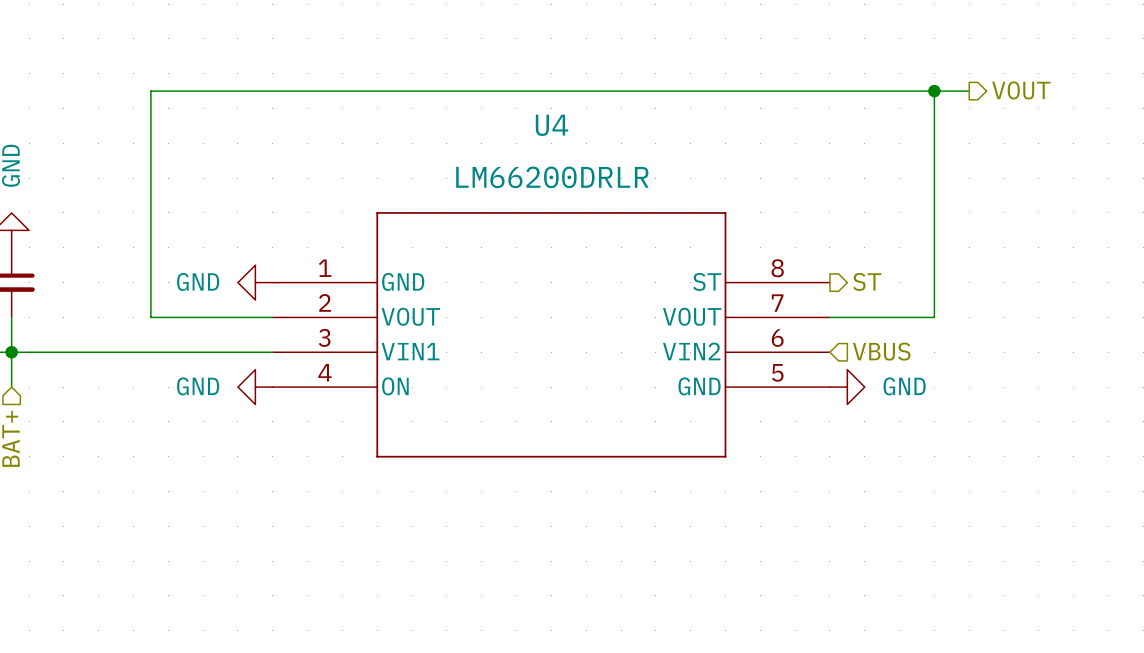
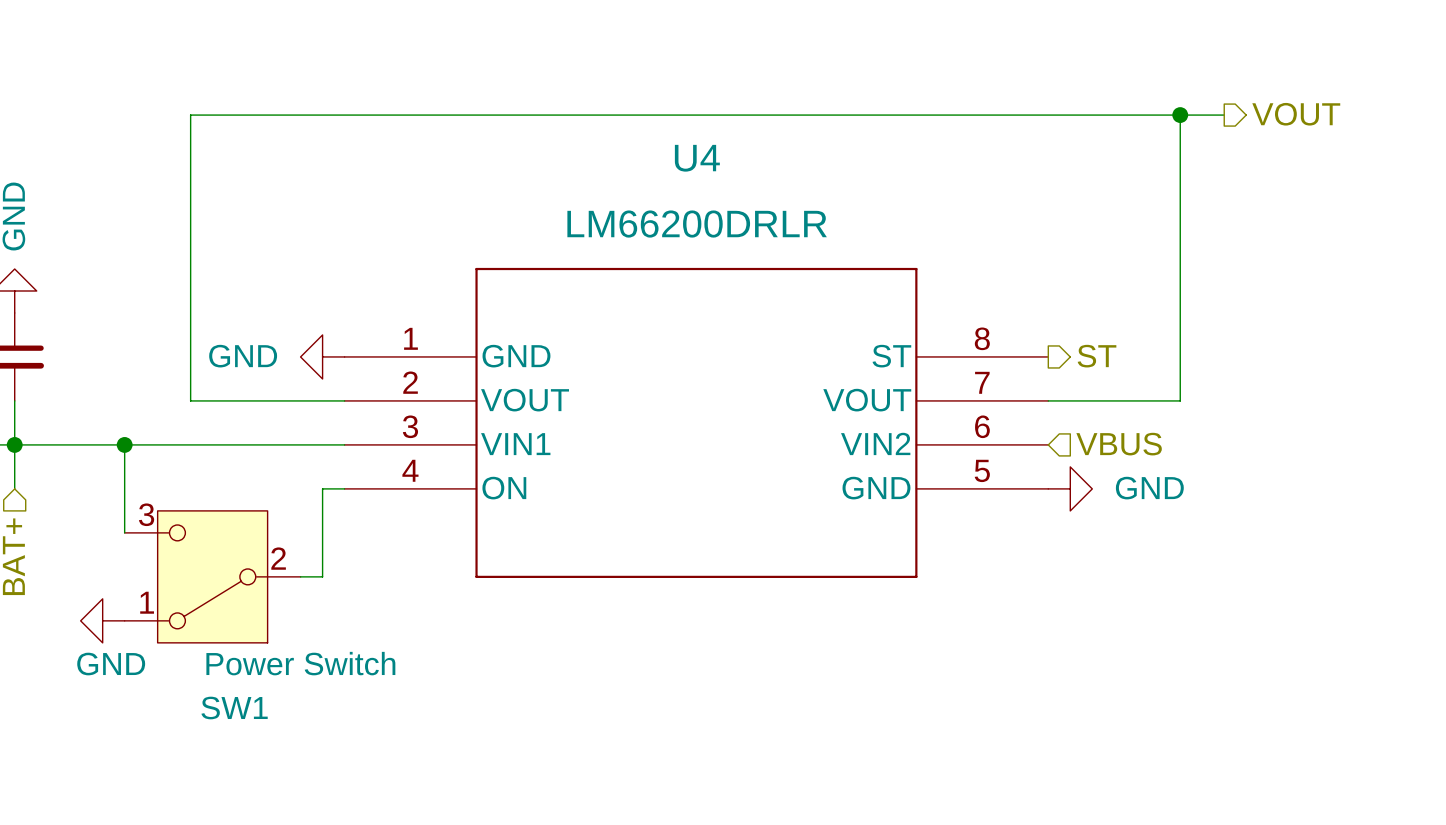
wire: none -> (124, 444) (124, 532)
junction: none -> (124, 444)
power symbol: GND (255, 387) -> none
wire: none -> (344, 488) (322, 488) (322, 576) (300, 576)
SW1: none -> Power Switch (212, 576)
power symbol: none -> GND (102, 620)

